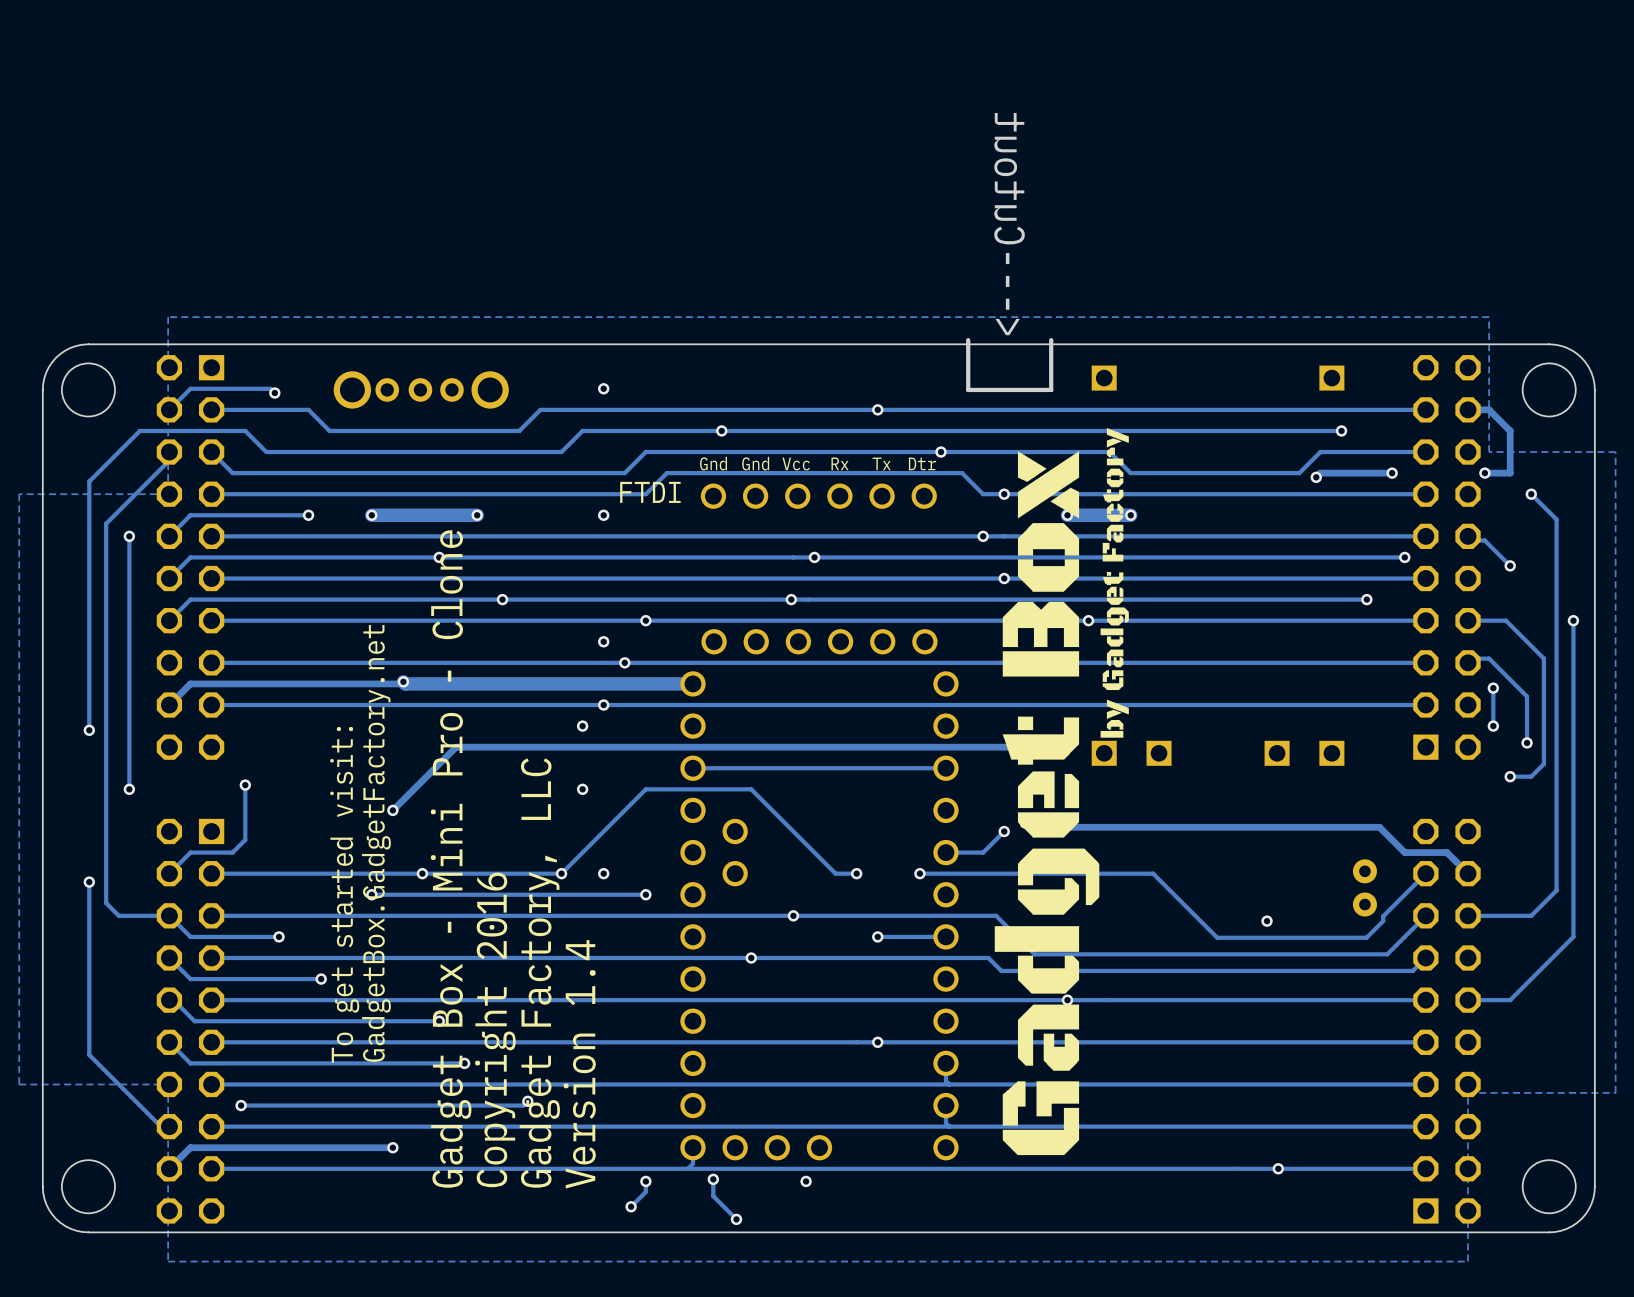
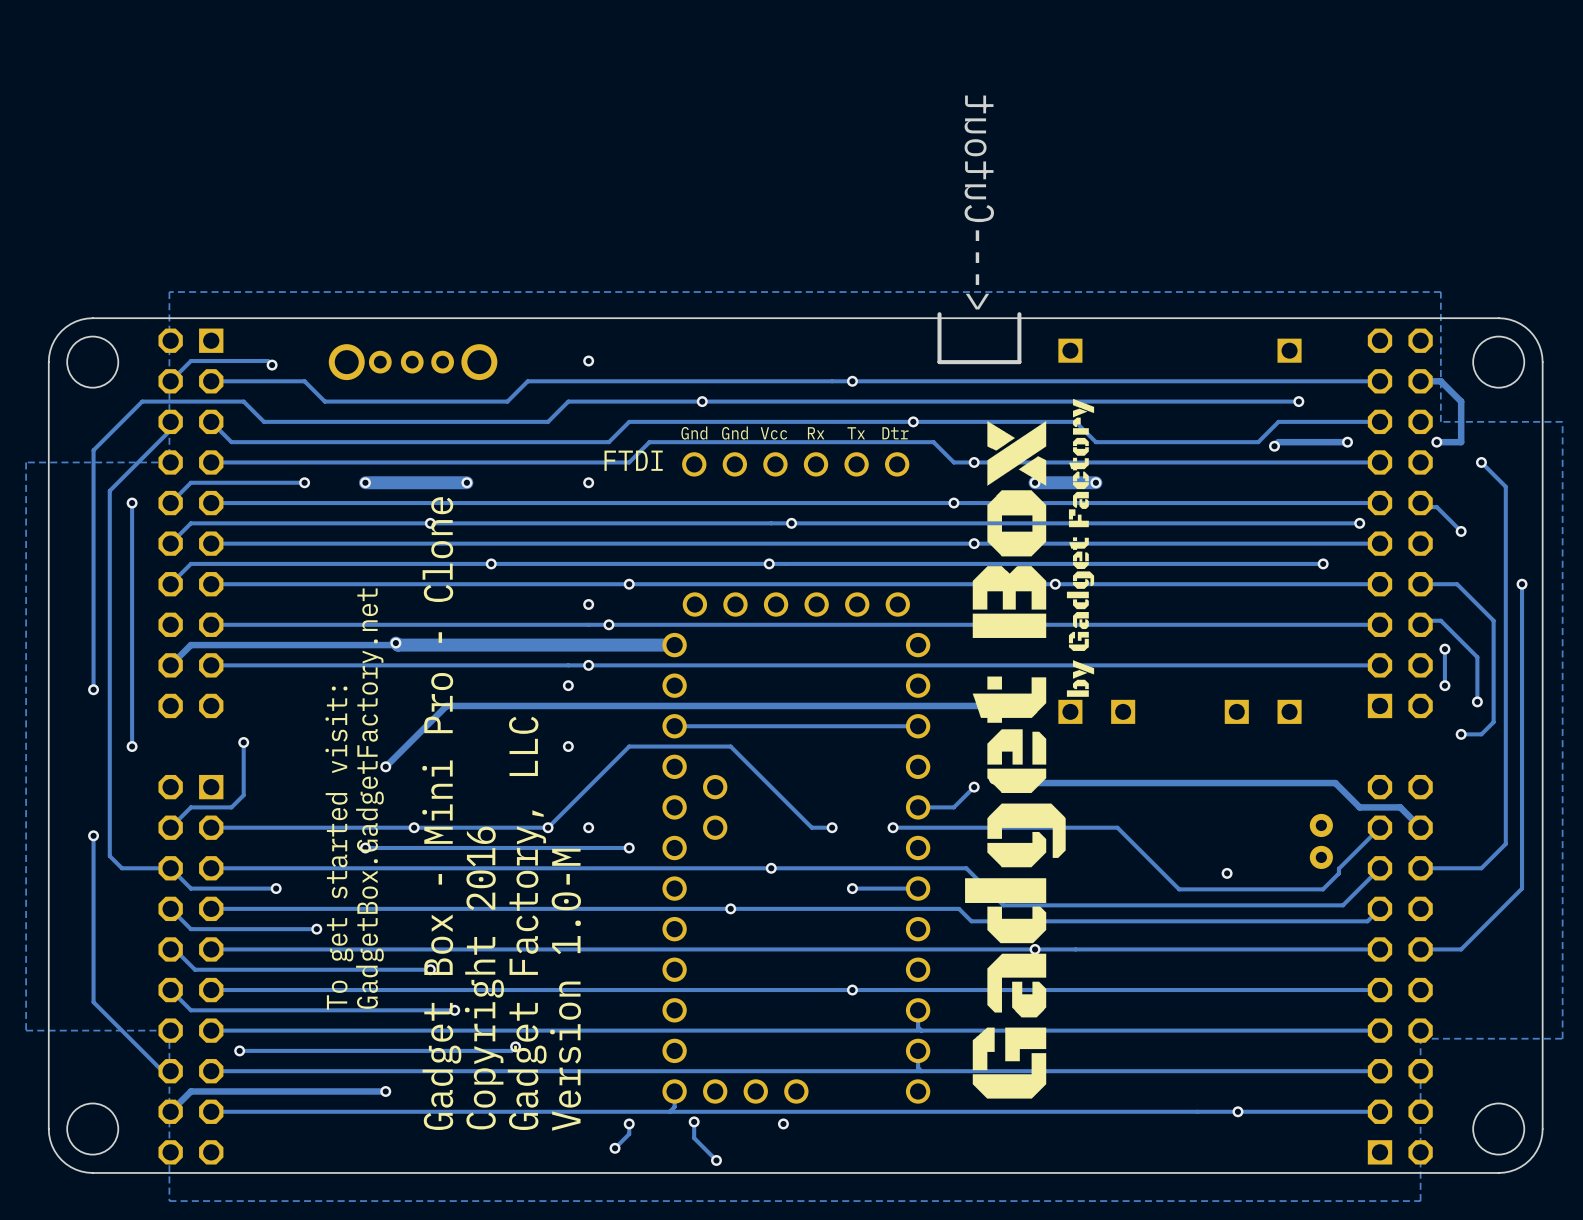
text: Version 1.4 (579, 1064) -> Version 1.0-M (565, 989)

